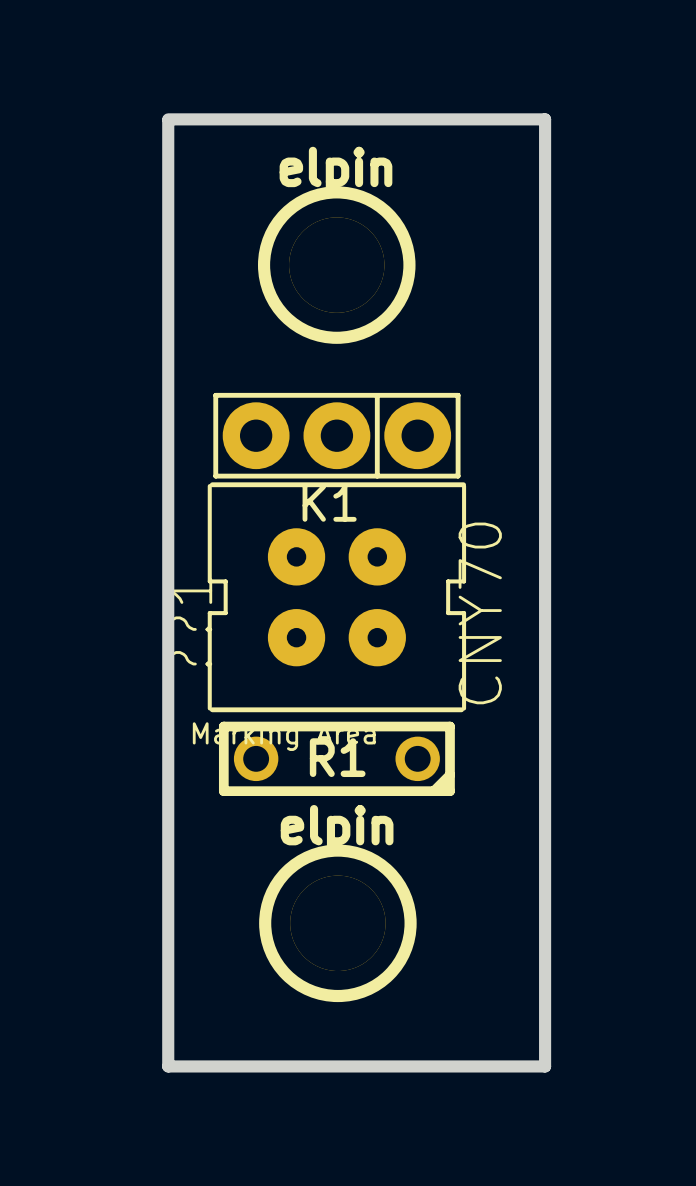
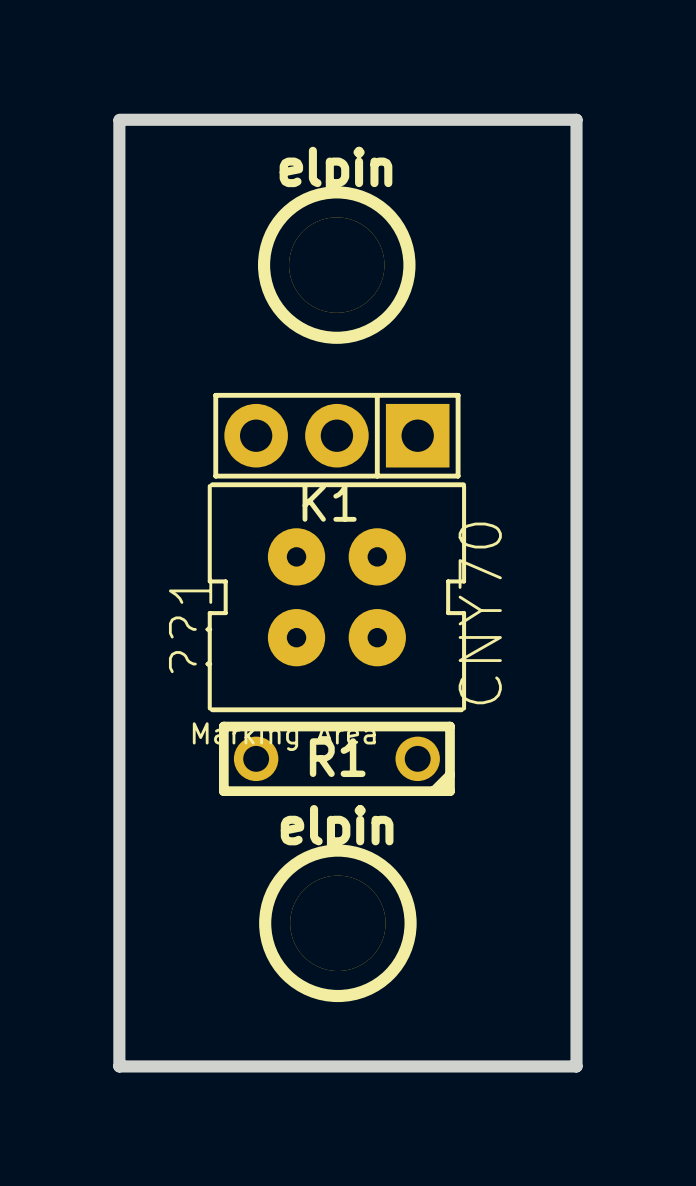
board edge: (168, 119) (545, 119) (545, 1066) -> (119, 119) (576, 119) (576, 1066) (545, 1066)
board edge: (168, 120) (168, 1066) -> (119, 120) (119, 1066) (168, 1066)
K1 footprint: [213, 392, 461, 479] -> [213, 392, 461, 479]

